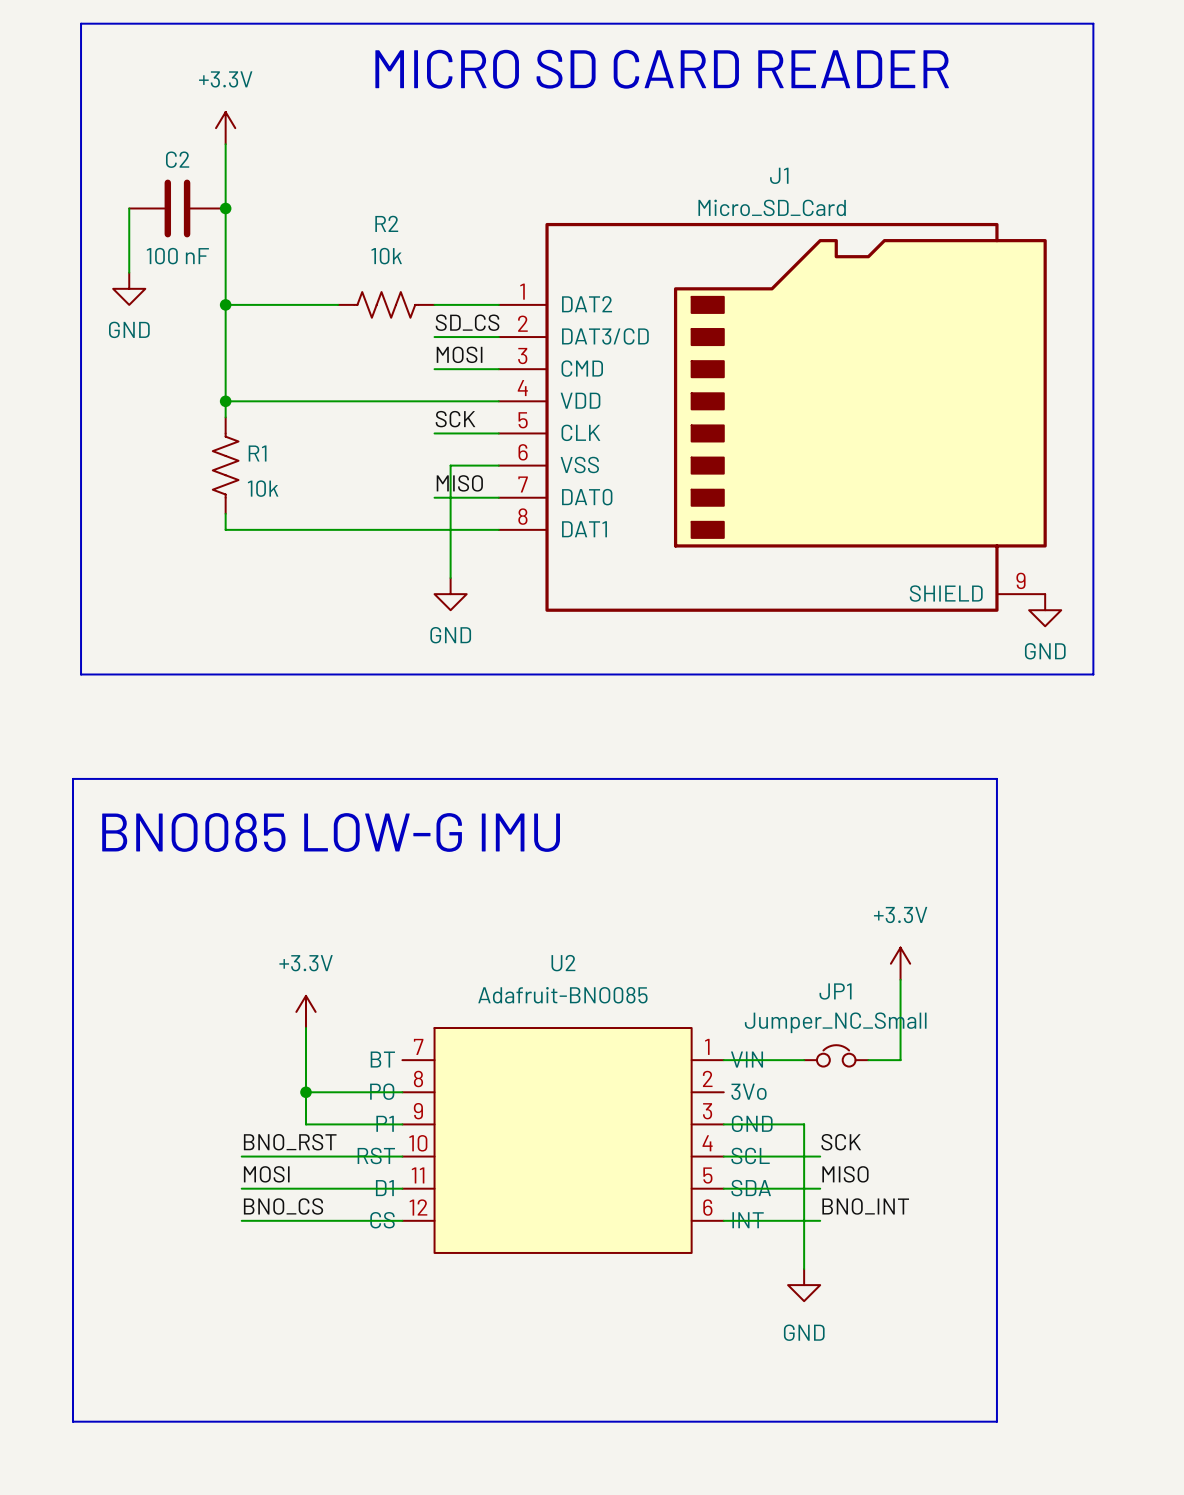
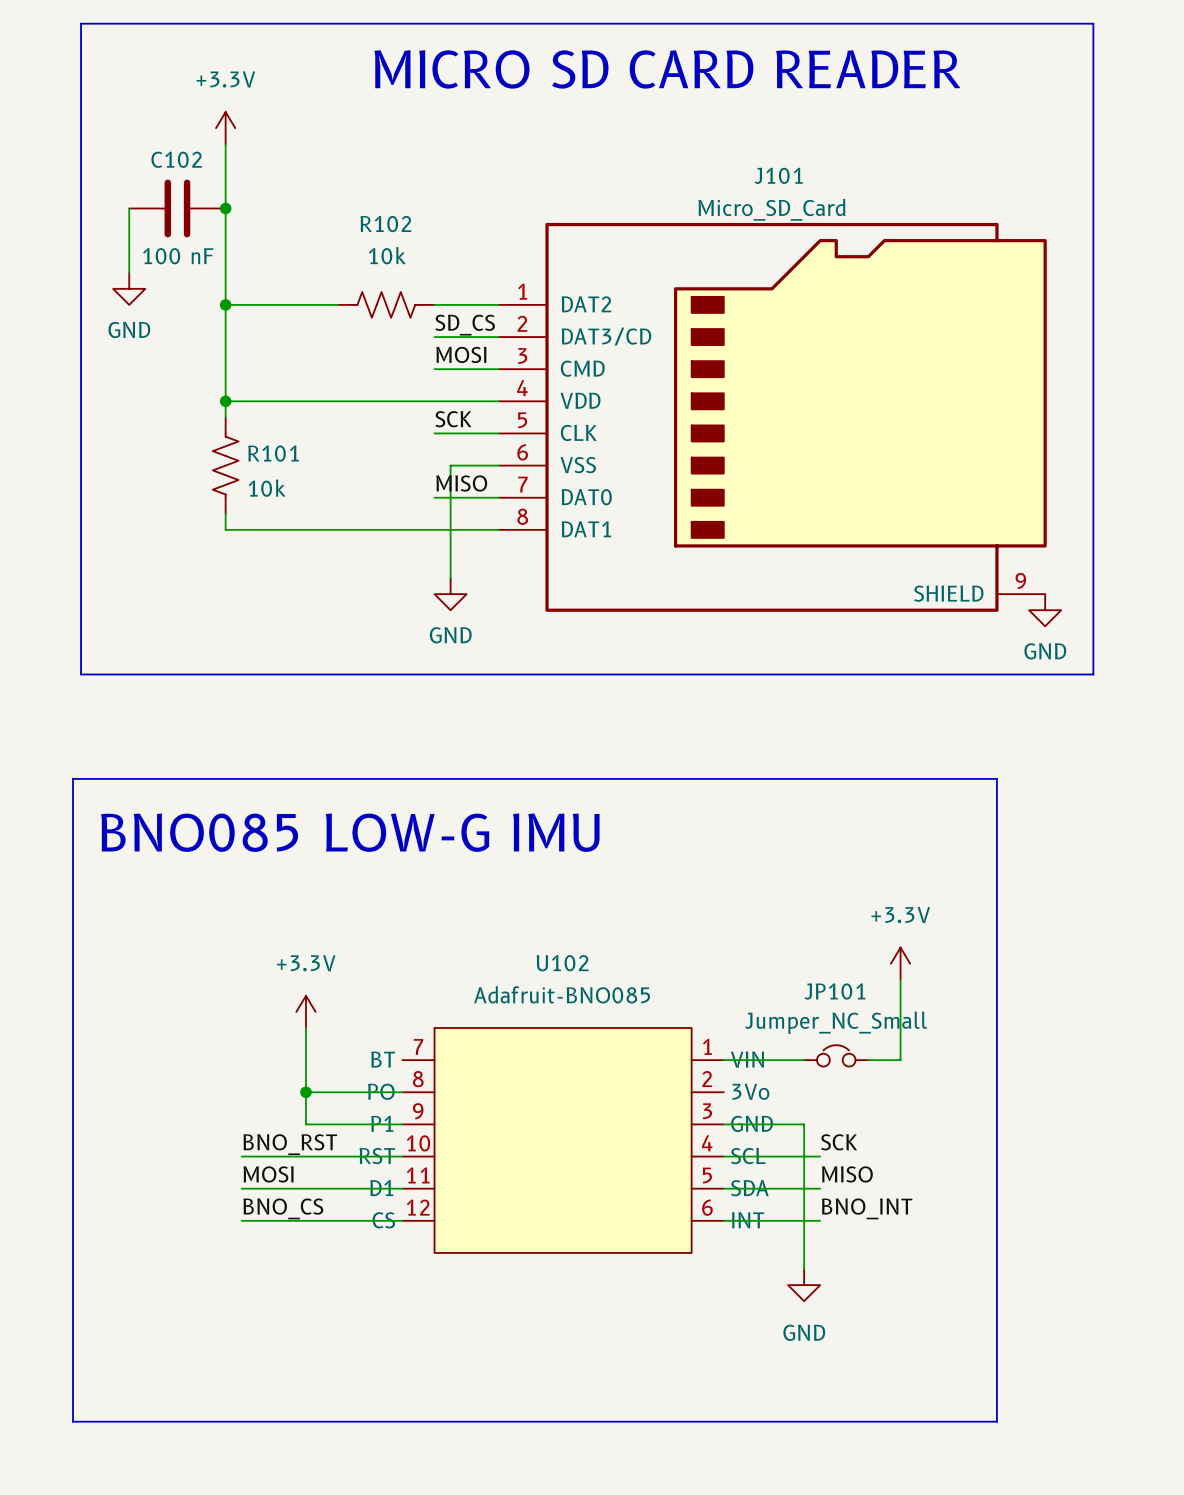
C2 name: C2 (177, 159) -> C102 (176, 159)
J1 name: J1 (779, 175) -> J101 (778, 175)
R2 name: R2 (386, 223) -> R102 (385, 224)
R1 name: R1 (257, 453) -> R101 (273, 453)
U2 name: U2 (563, 963) -> U102 (562, 963)
JP1 name: JP1 (835, 991) -> JP101 (834, 991)

